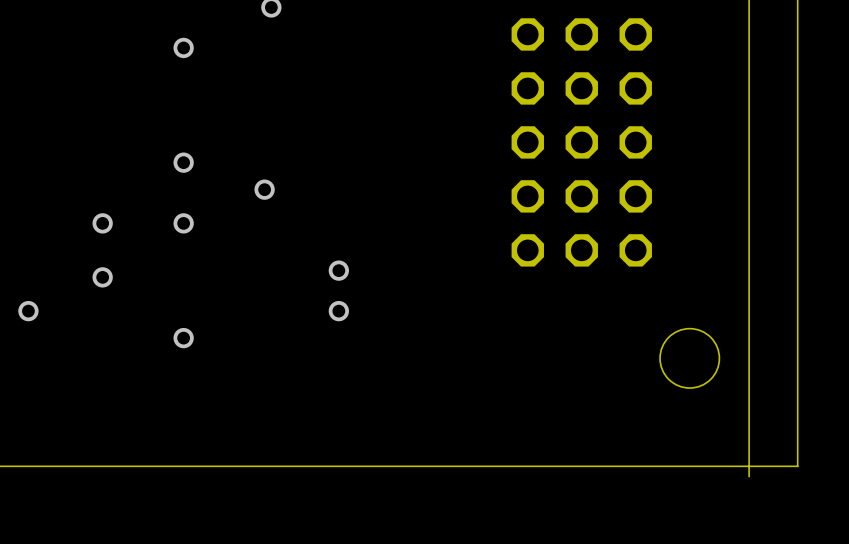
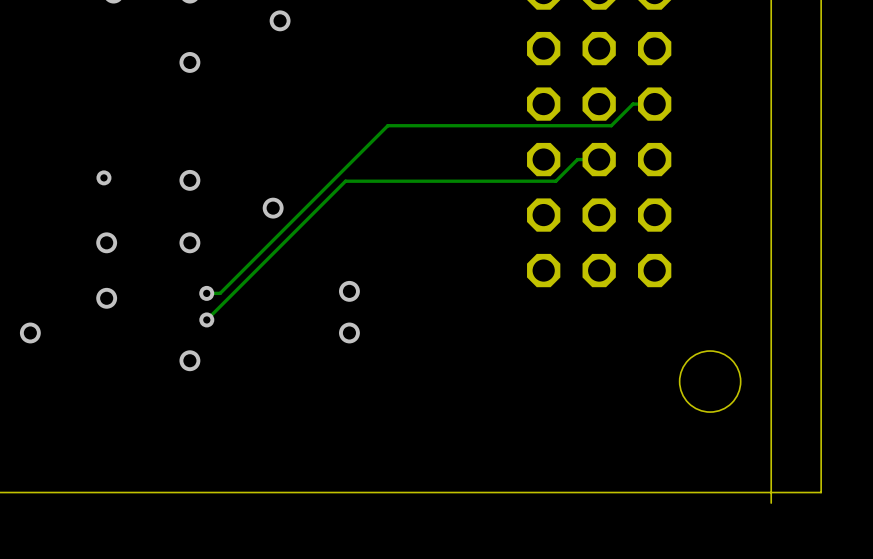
track: none -> (654, 104) (633, 104) (611, 125) (387, 125) (220, 293) (206, 293)
track: none -> (599, 159) (577, 159) (555, 181) (345, 181) (206, 319)
via: none -> (103, 177)
via: none -> (206, 293)
via: none -> (206, 319)

